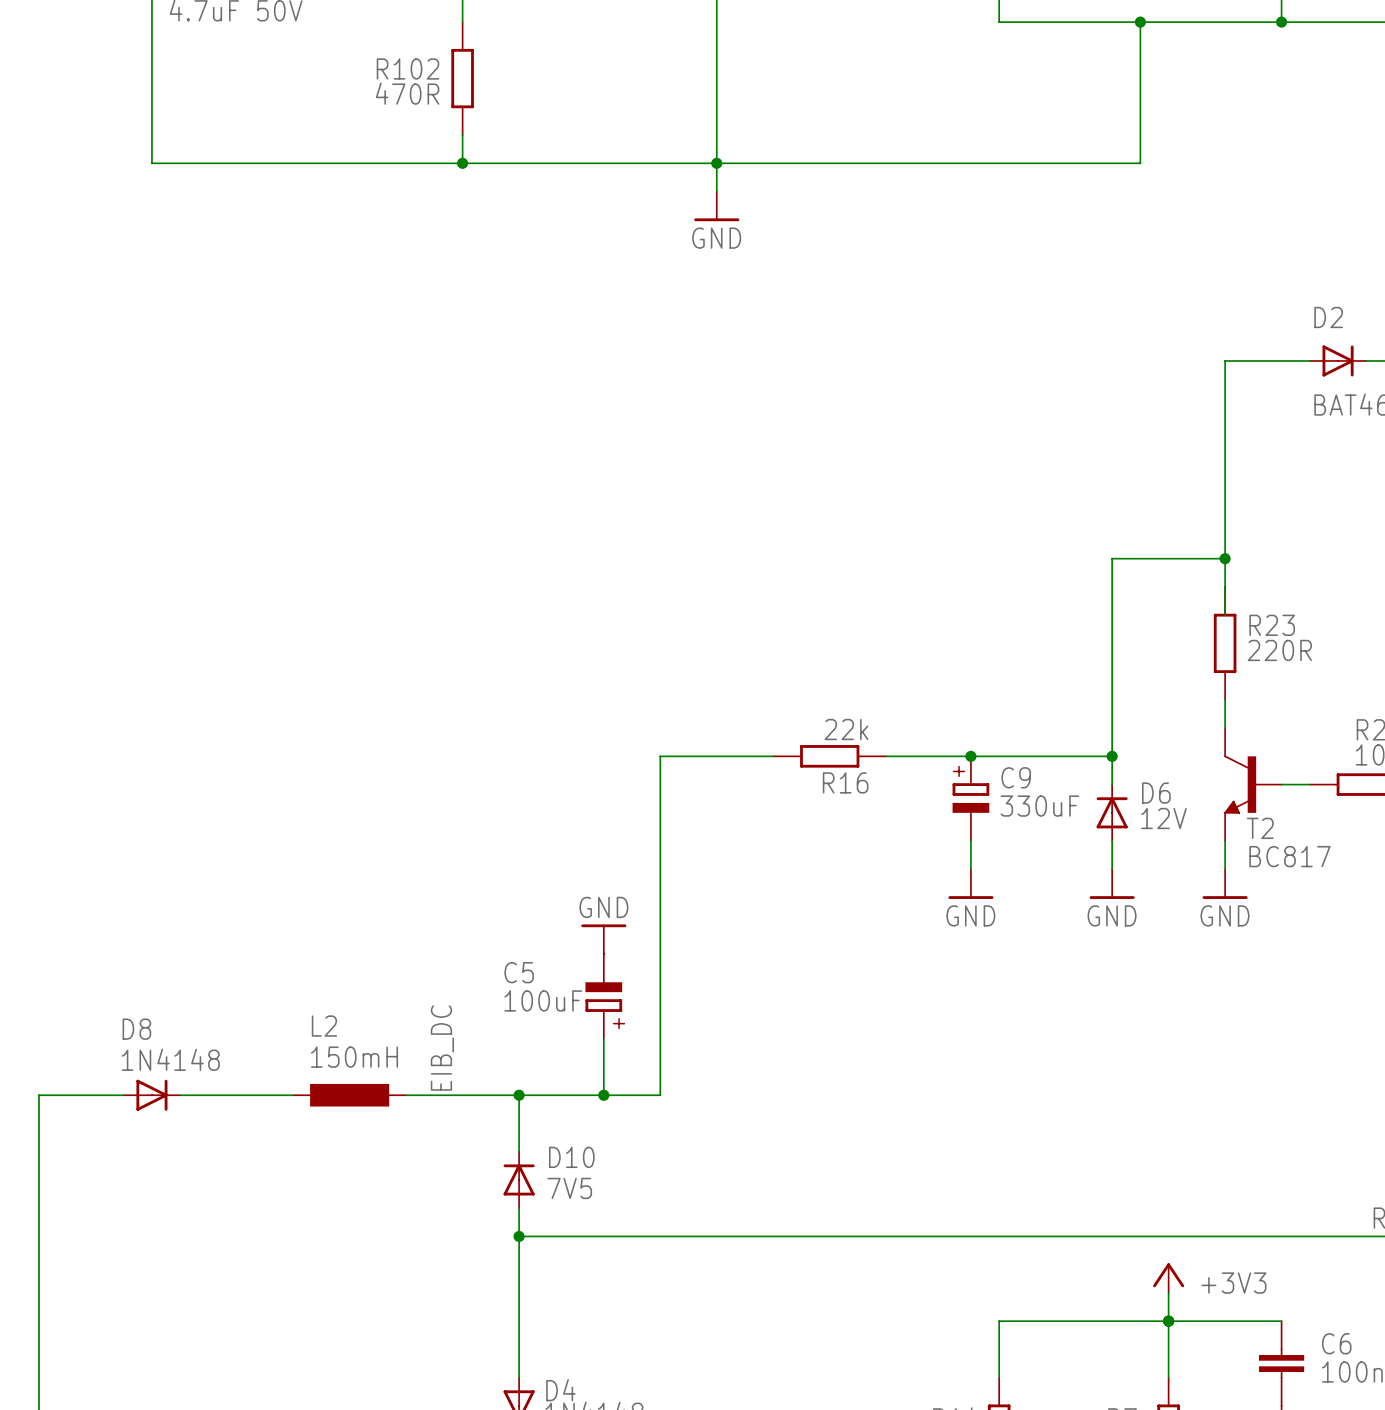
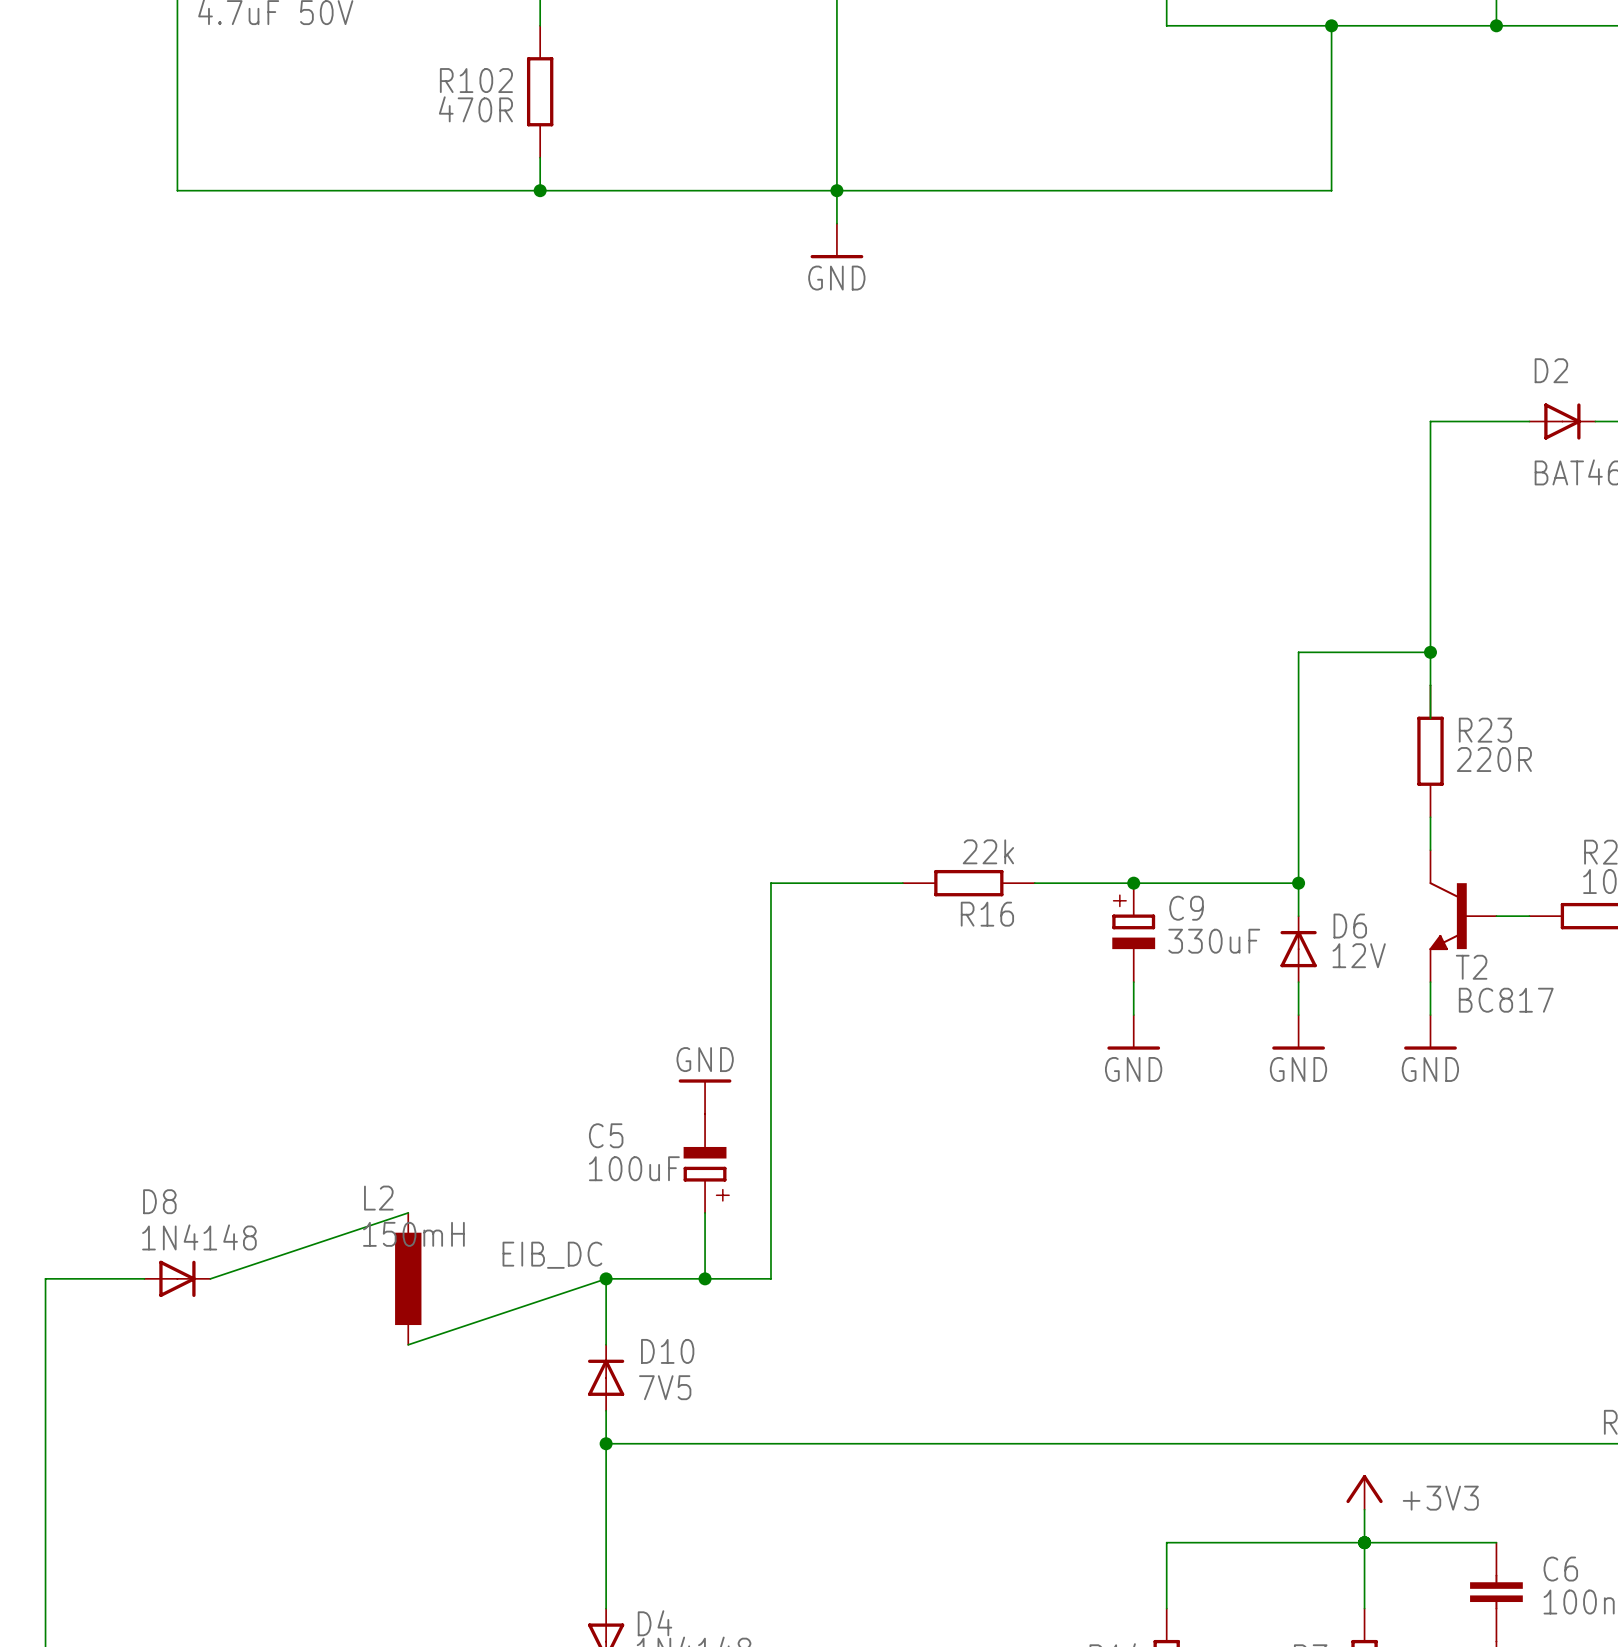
label rotation: 0° (442, 1048) -> 90° clockwise (552, 1255)
wire: (180, 1095) (293, 1095) -> (210, 1278) (408, 1212)
L2 rotation: 0° (349, 1095) -> 90° clockwise (408, 1278)
wire: (406, 1095) (519, 1095) -> (408, 1344) (606, 1278)

